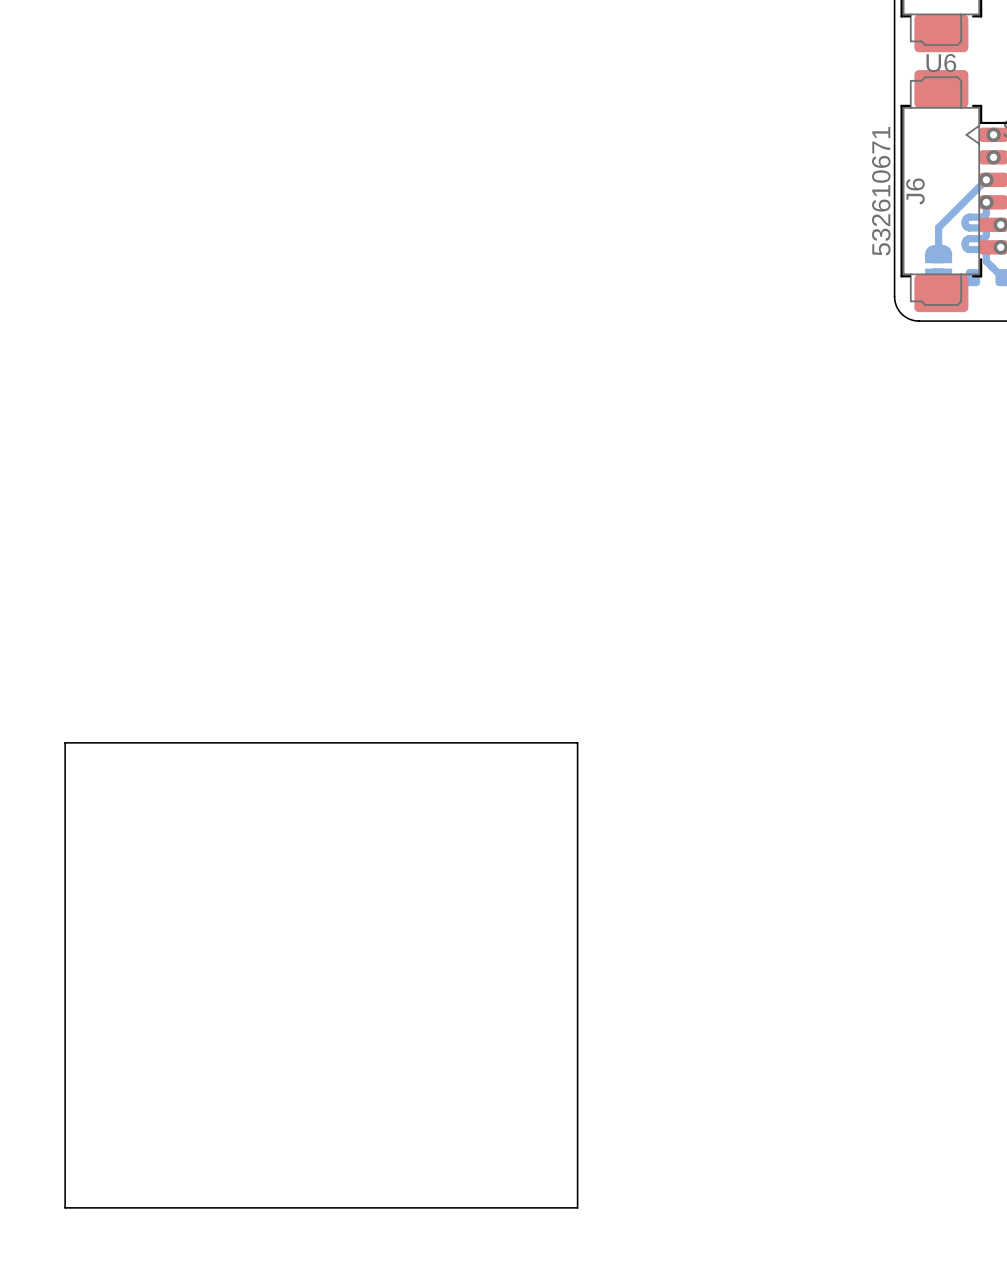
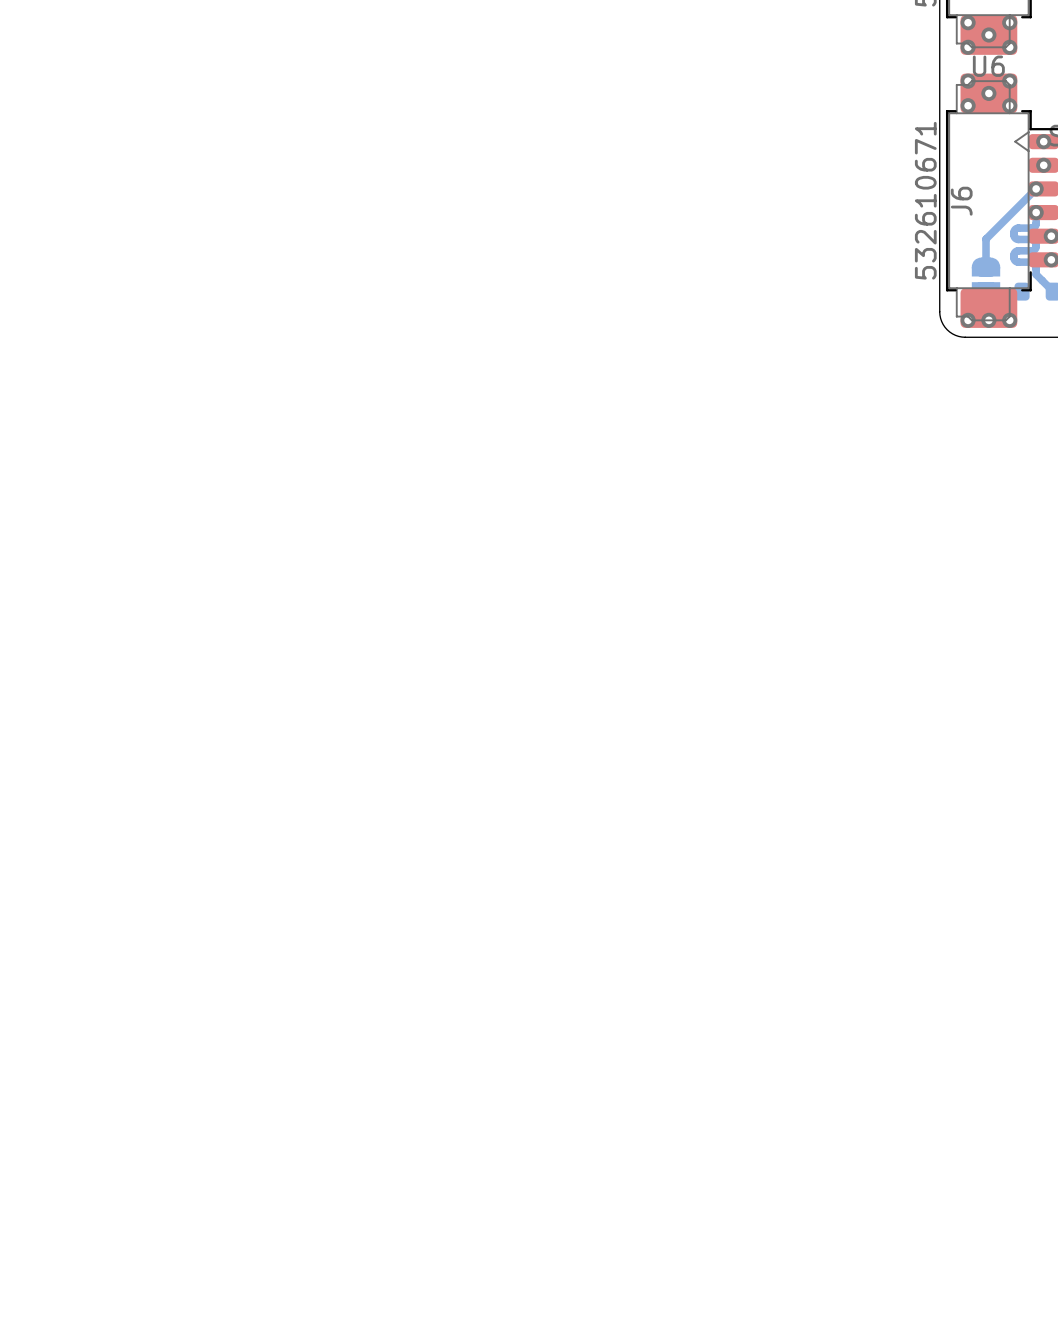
via: none -> (968, 22)
via: none -> (1009, 22)
via: none -> (988, 35)
via: none -> (968, 47)
via: none -> (1009, 47)
via: none -> (968, 81)
via: none -> (1009, 81)
via: none -> (988, 93)
via: none -> (968, 105)
via: none -> (1009, 105)
via: none -> (968, 320)
via: none -> (988, 320)
via: none -> (1009, 320)
board edge: (65, 742) (577, 742) (577, 1207) (65, 1207) (65, 742) -> none

